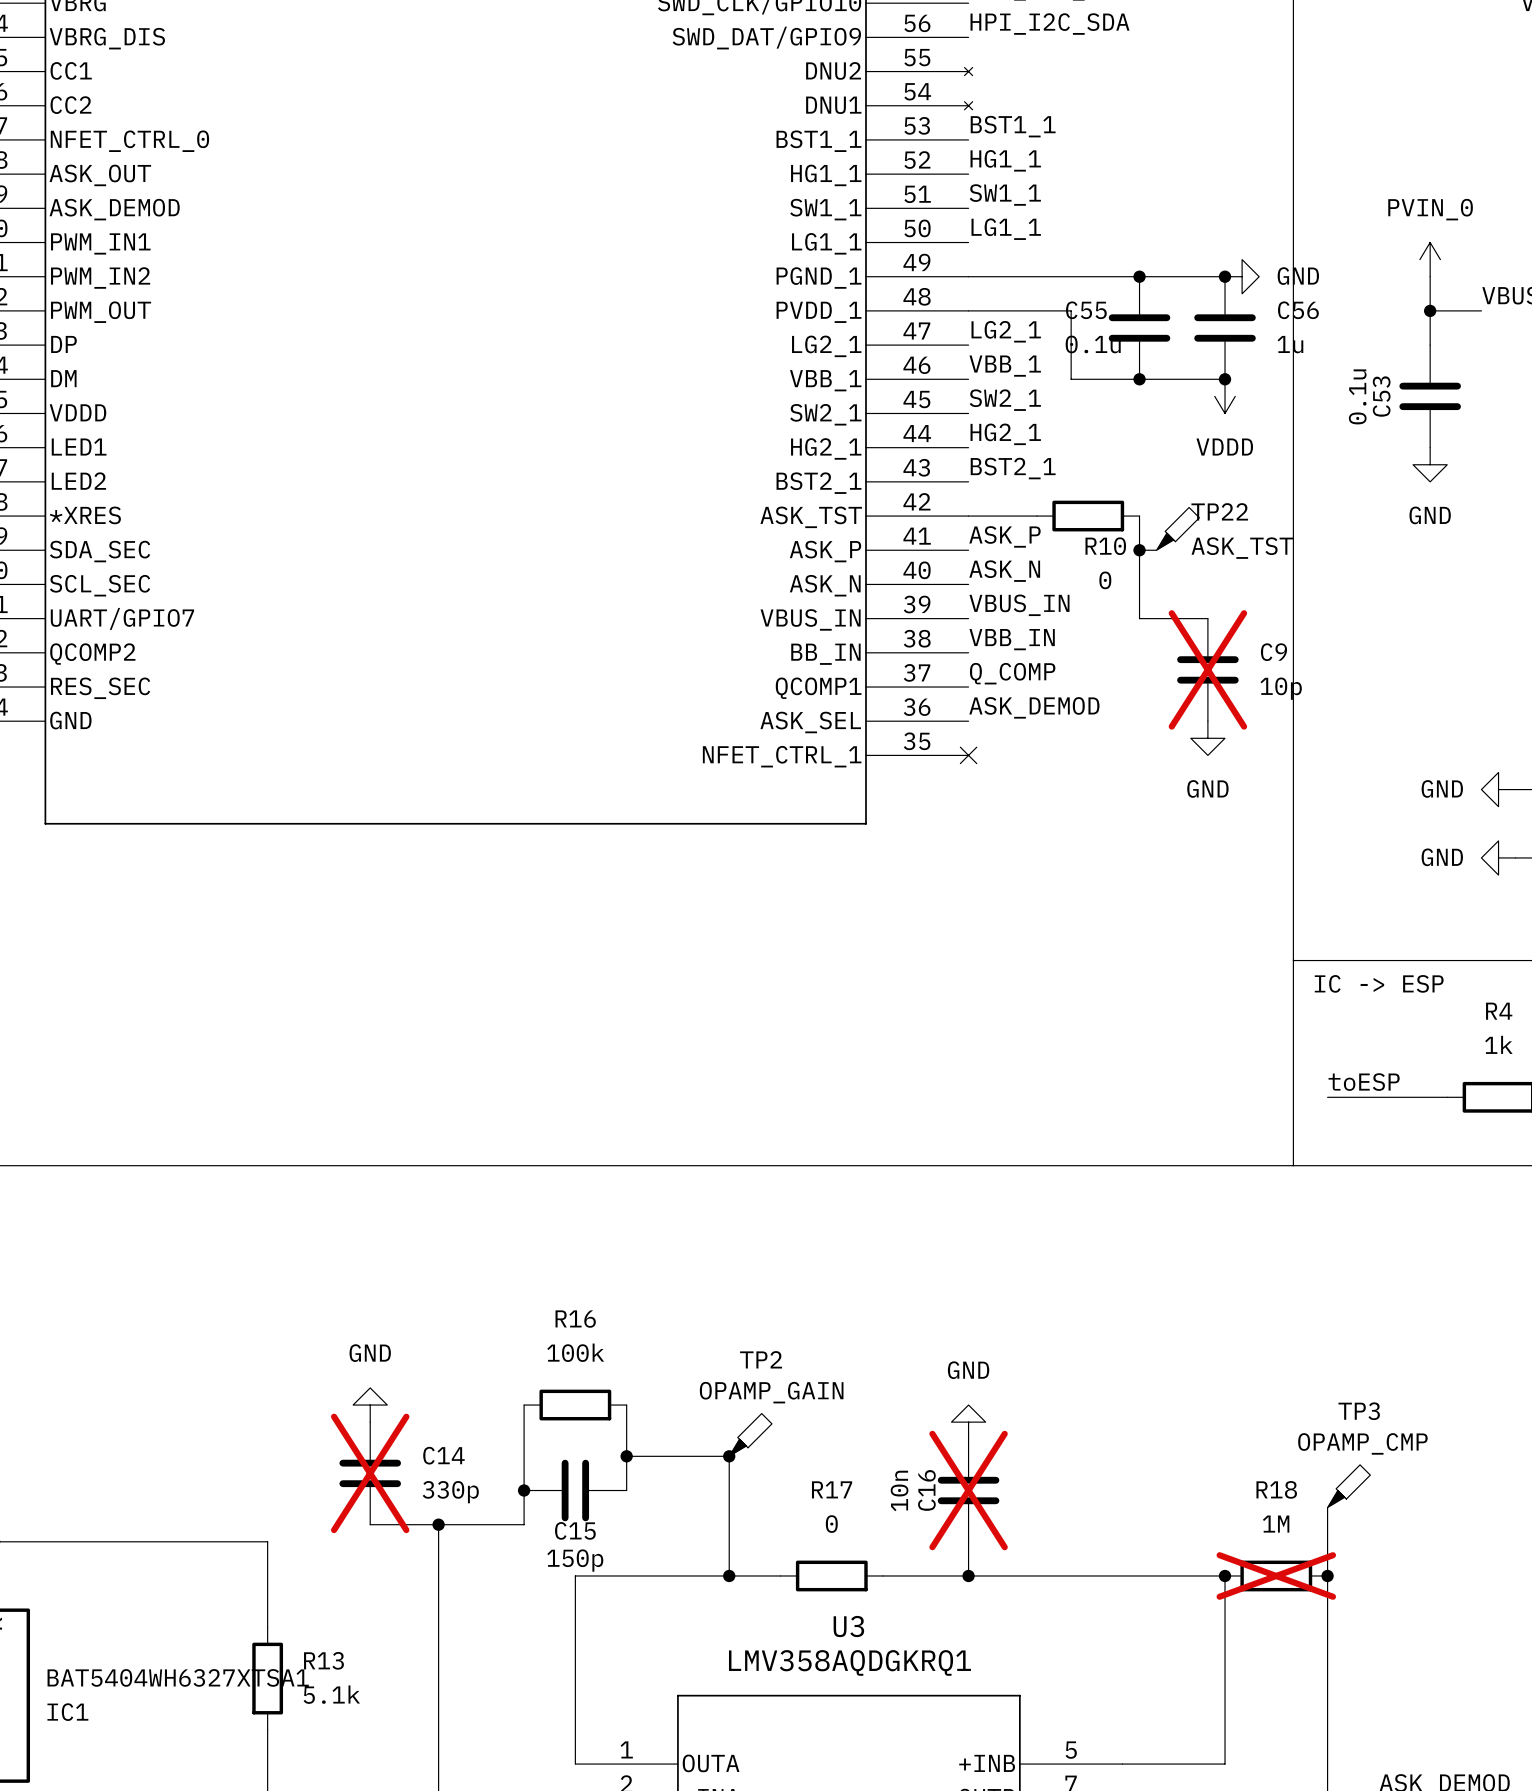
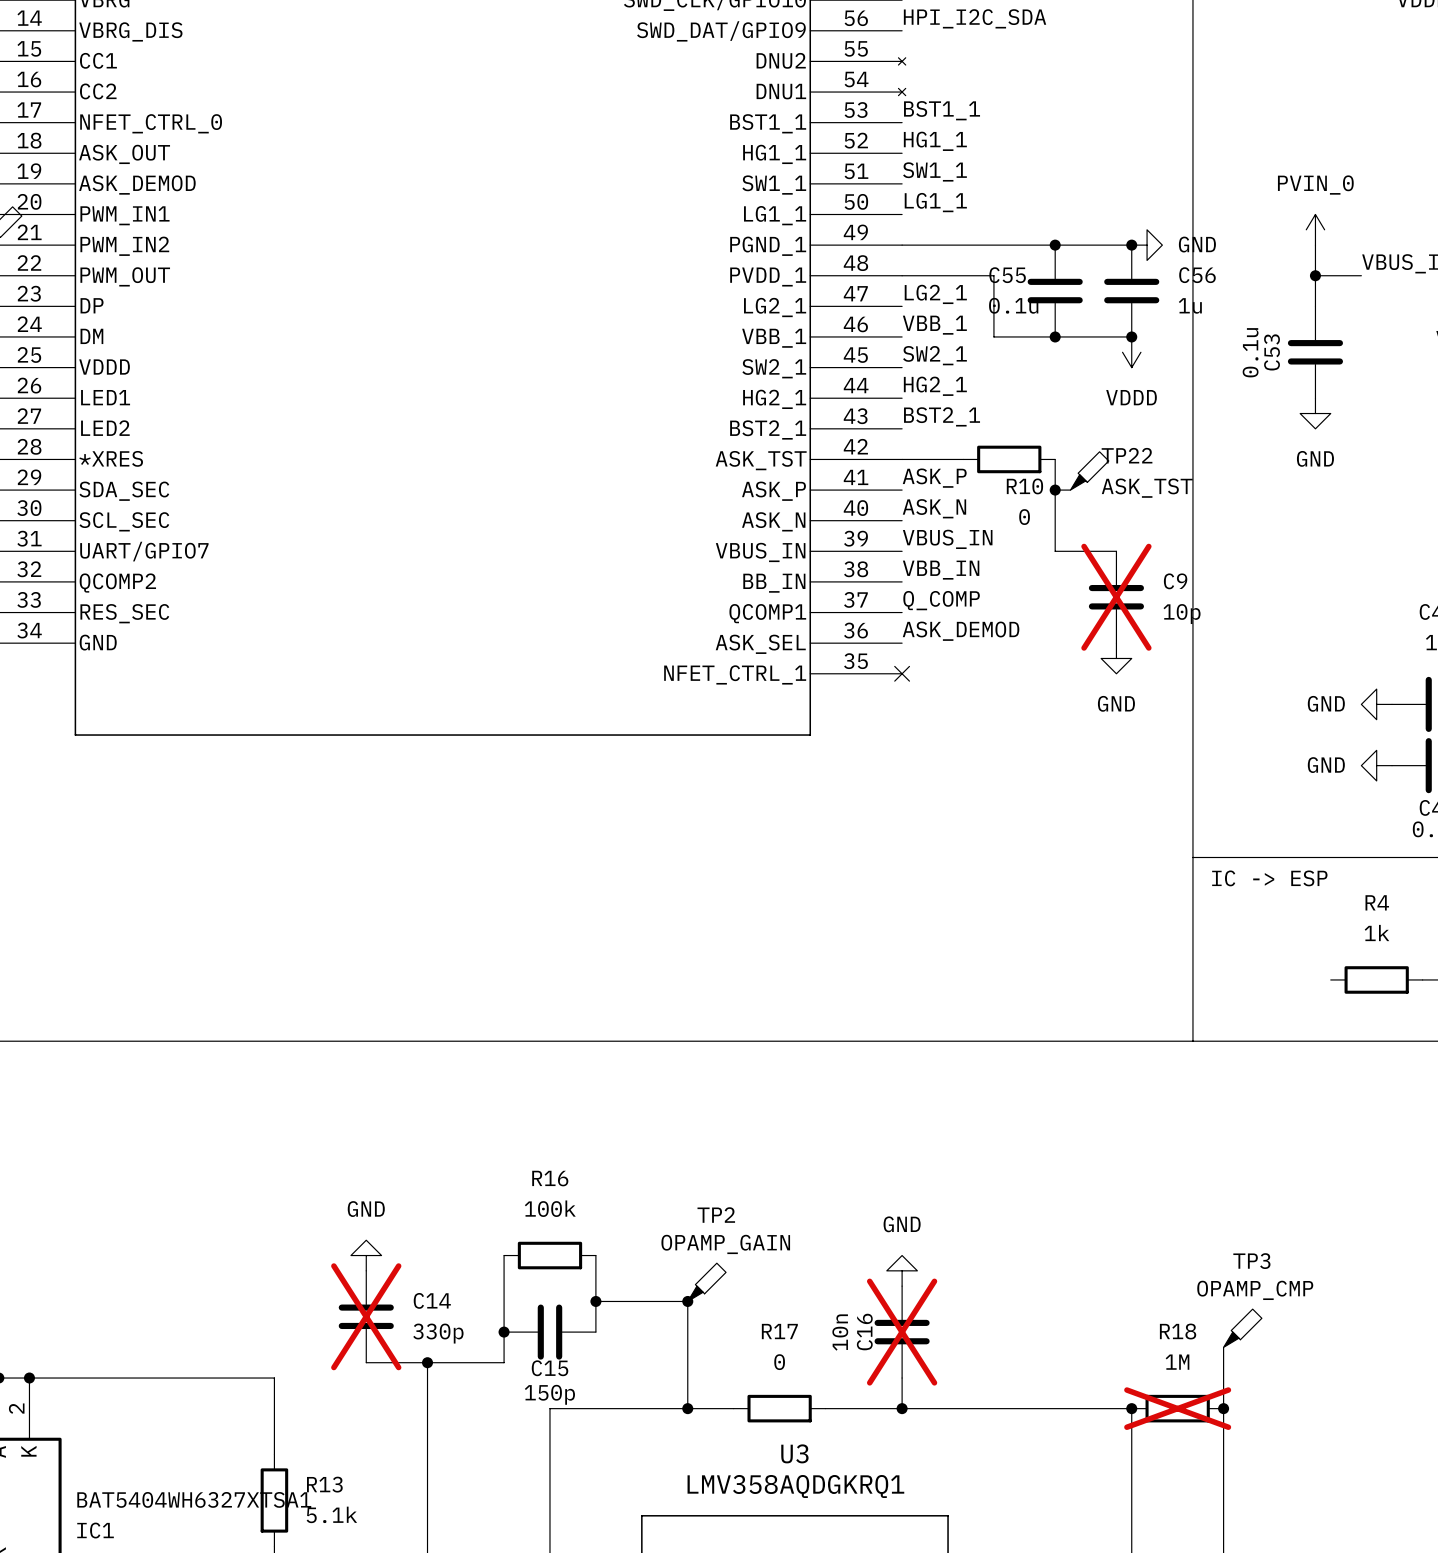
label: toESP (1364, 1082) -> none
wire: (1327, 1097) (1447, 1097) -> none

